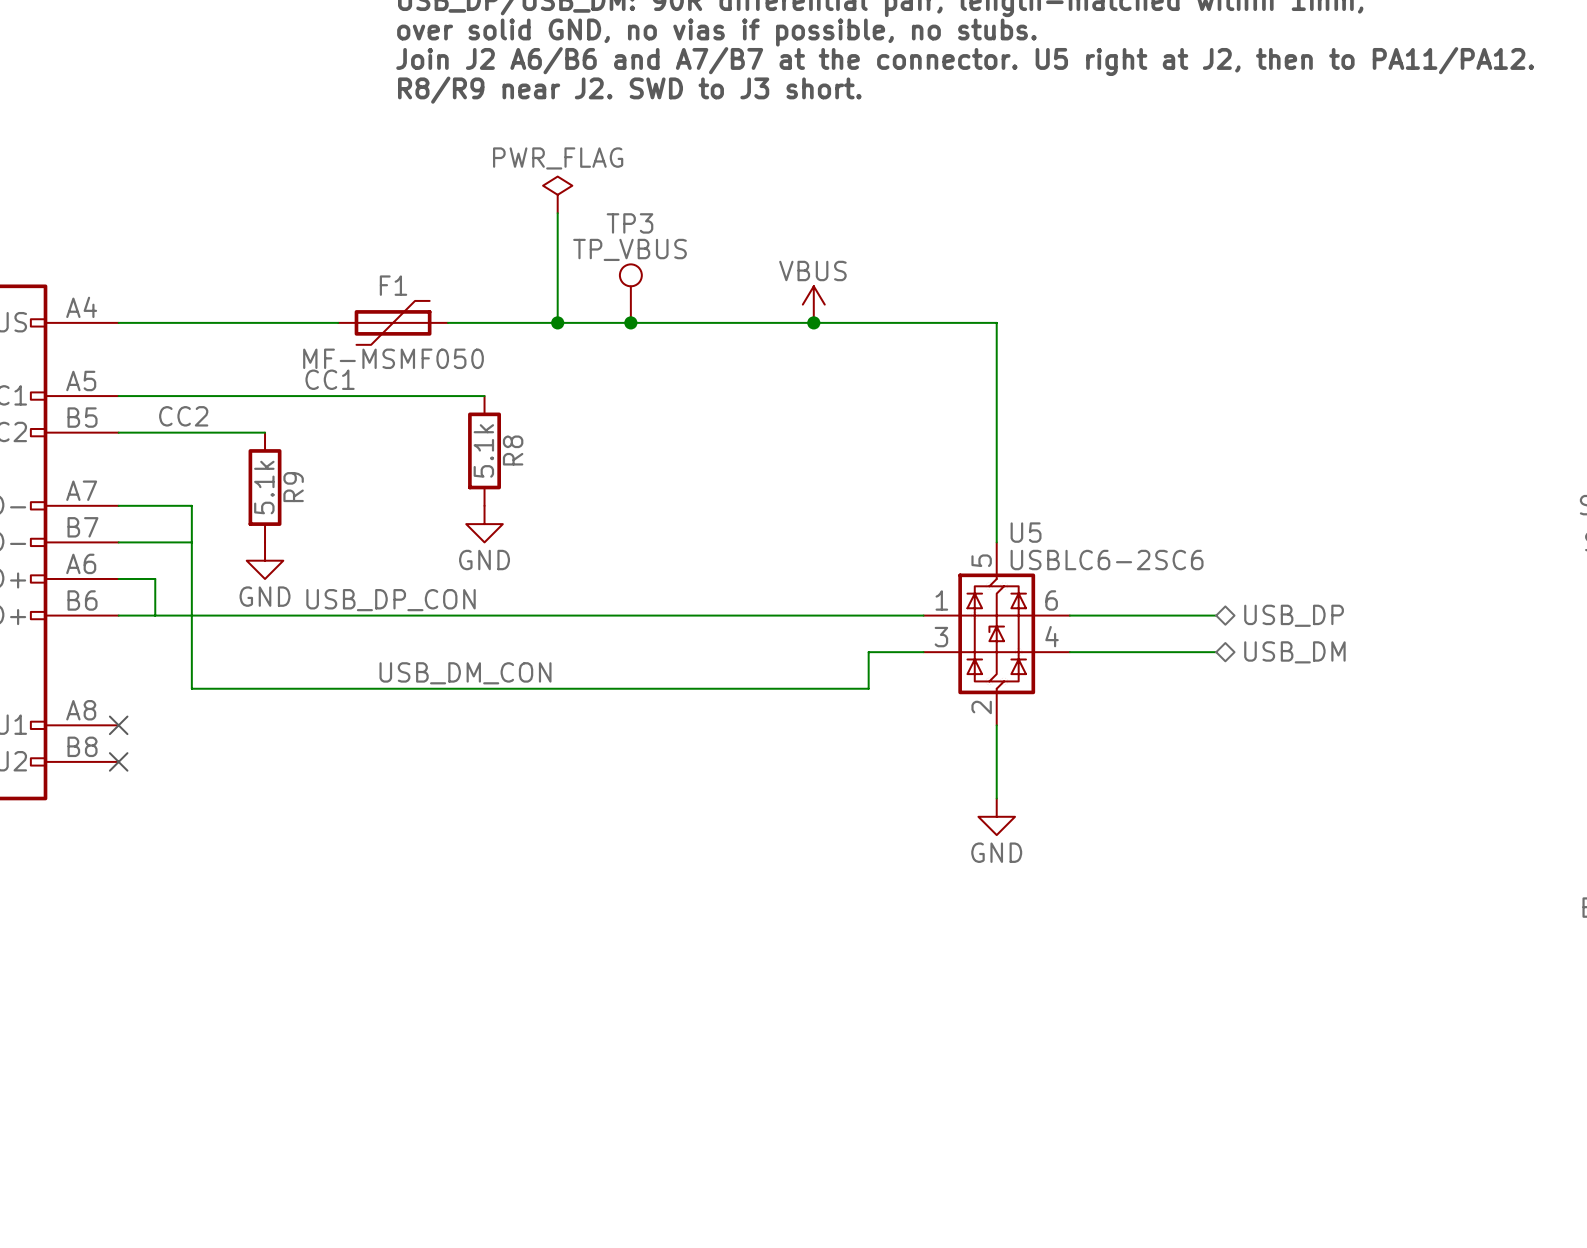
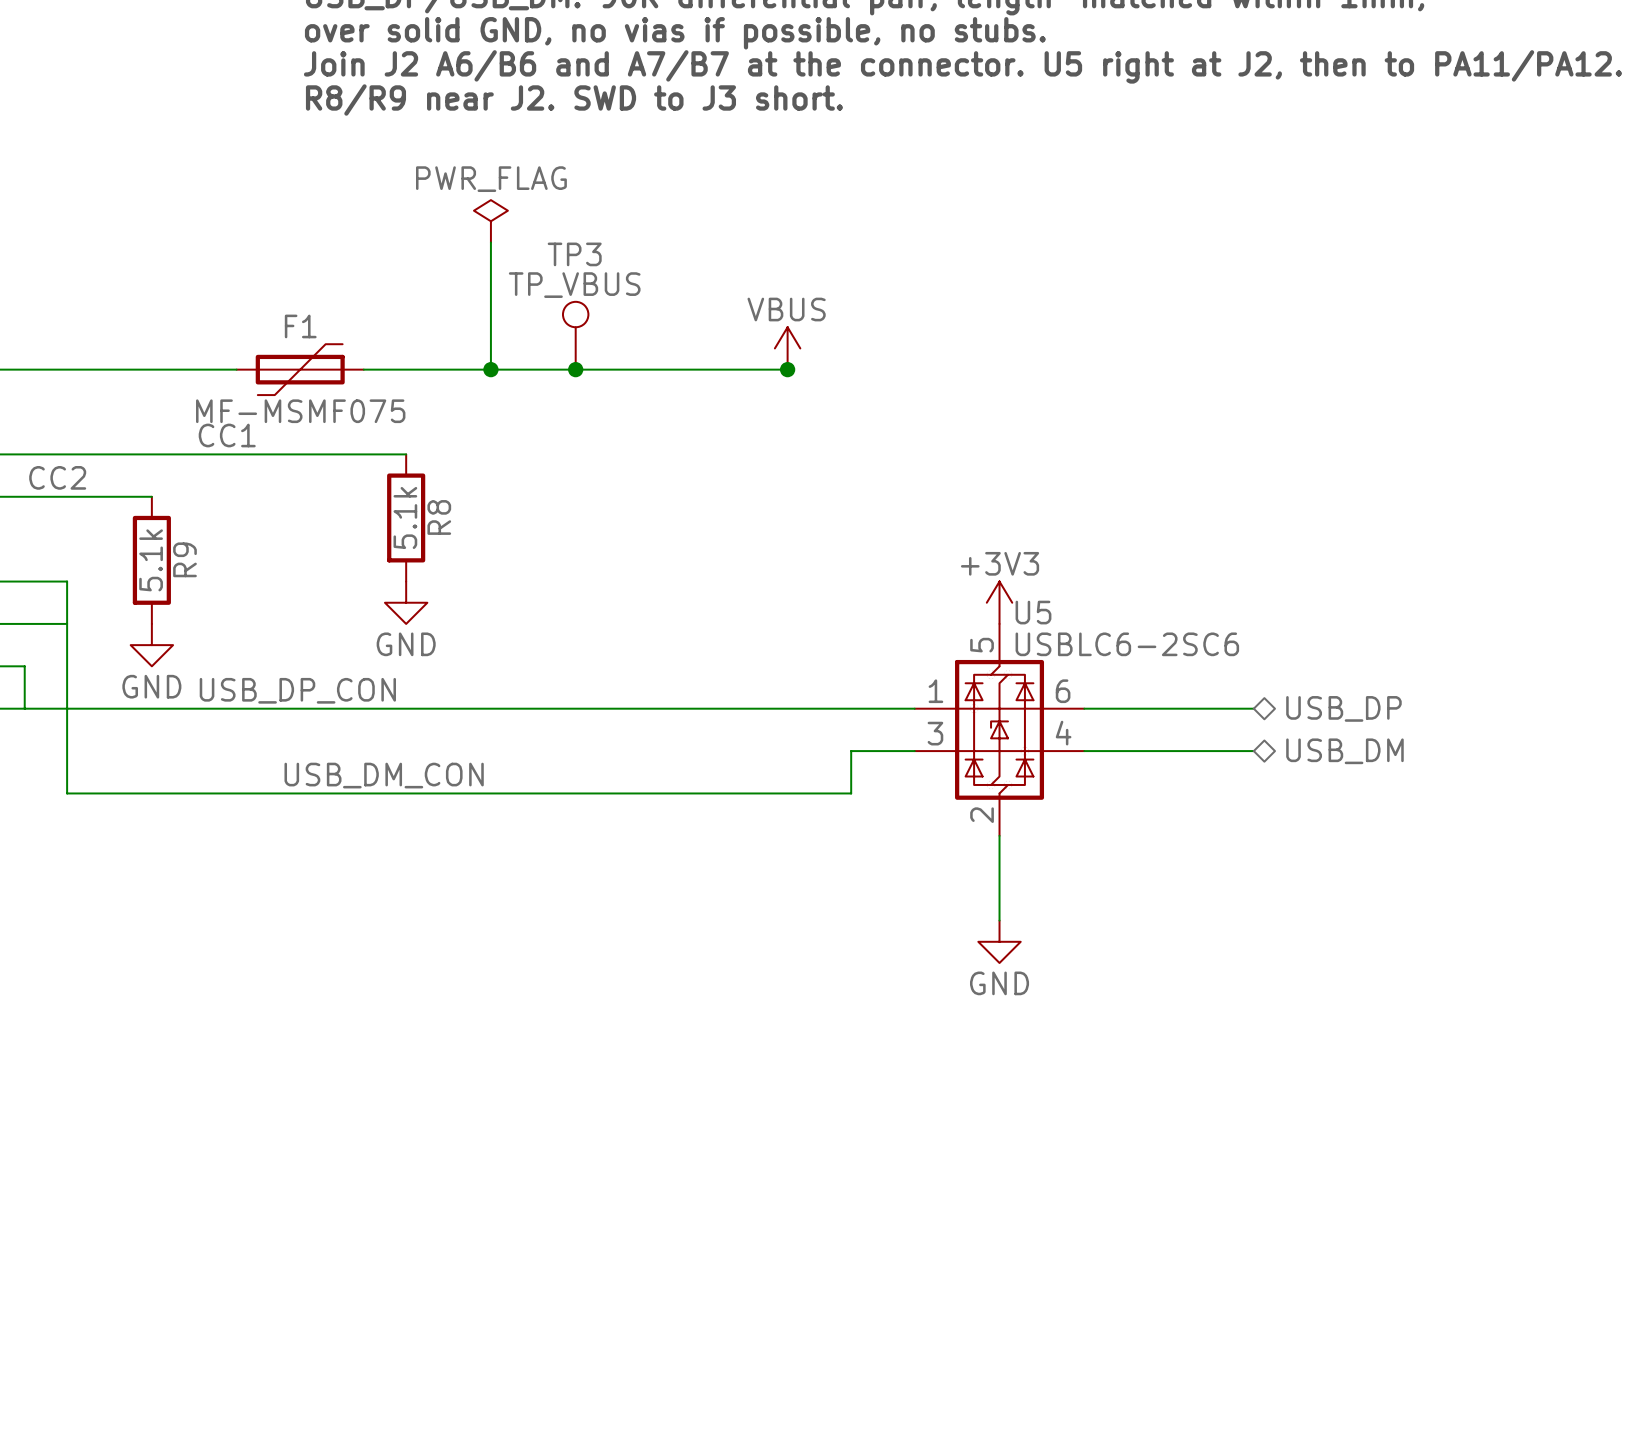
wire: (813, 322) (996, 322) (996, 542) -> none
F1 value: MF-MSMF050 (393, 358) -> MF-MSMF075 (300, 411)
power symbol: none -> +3V3 (999, 602)

